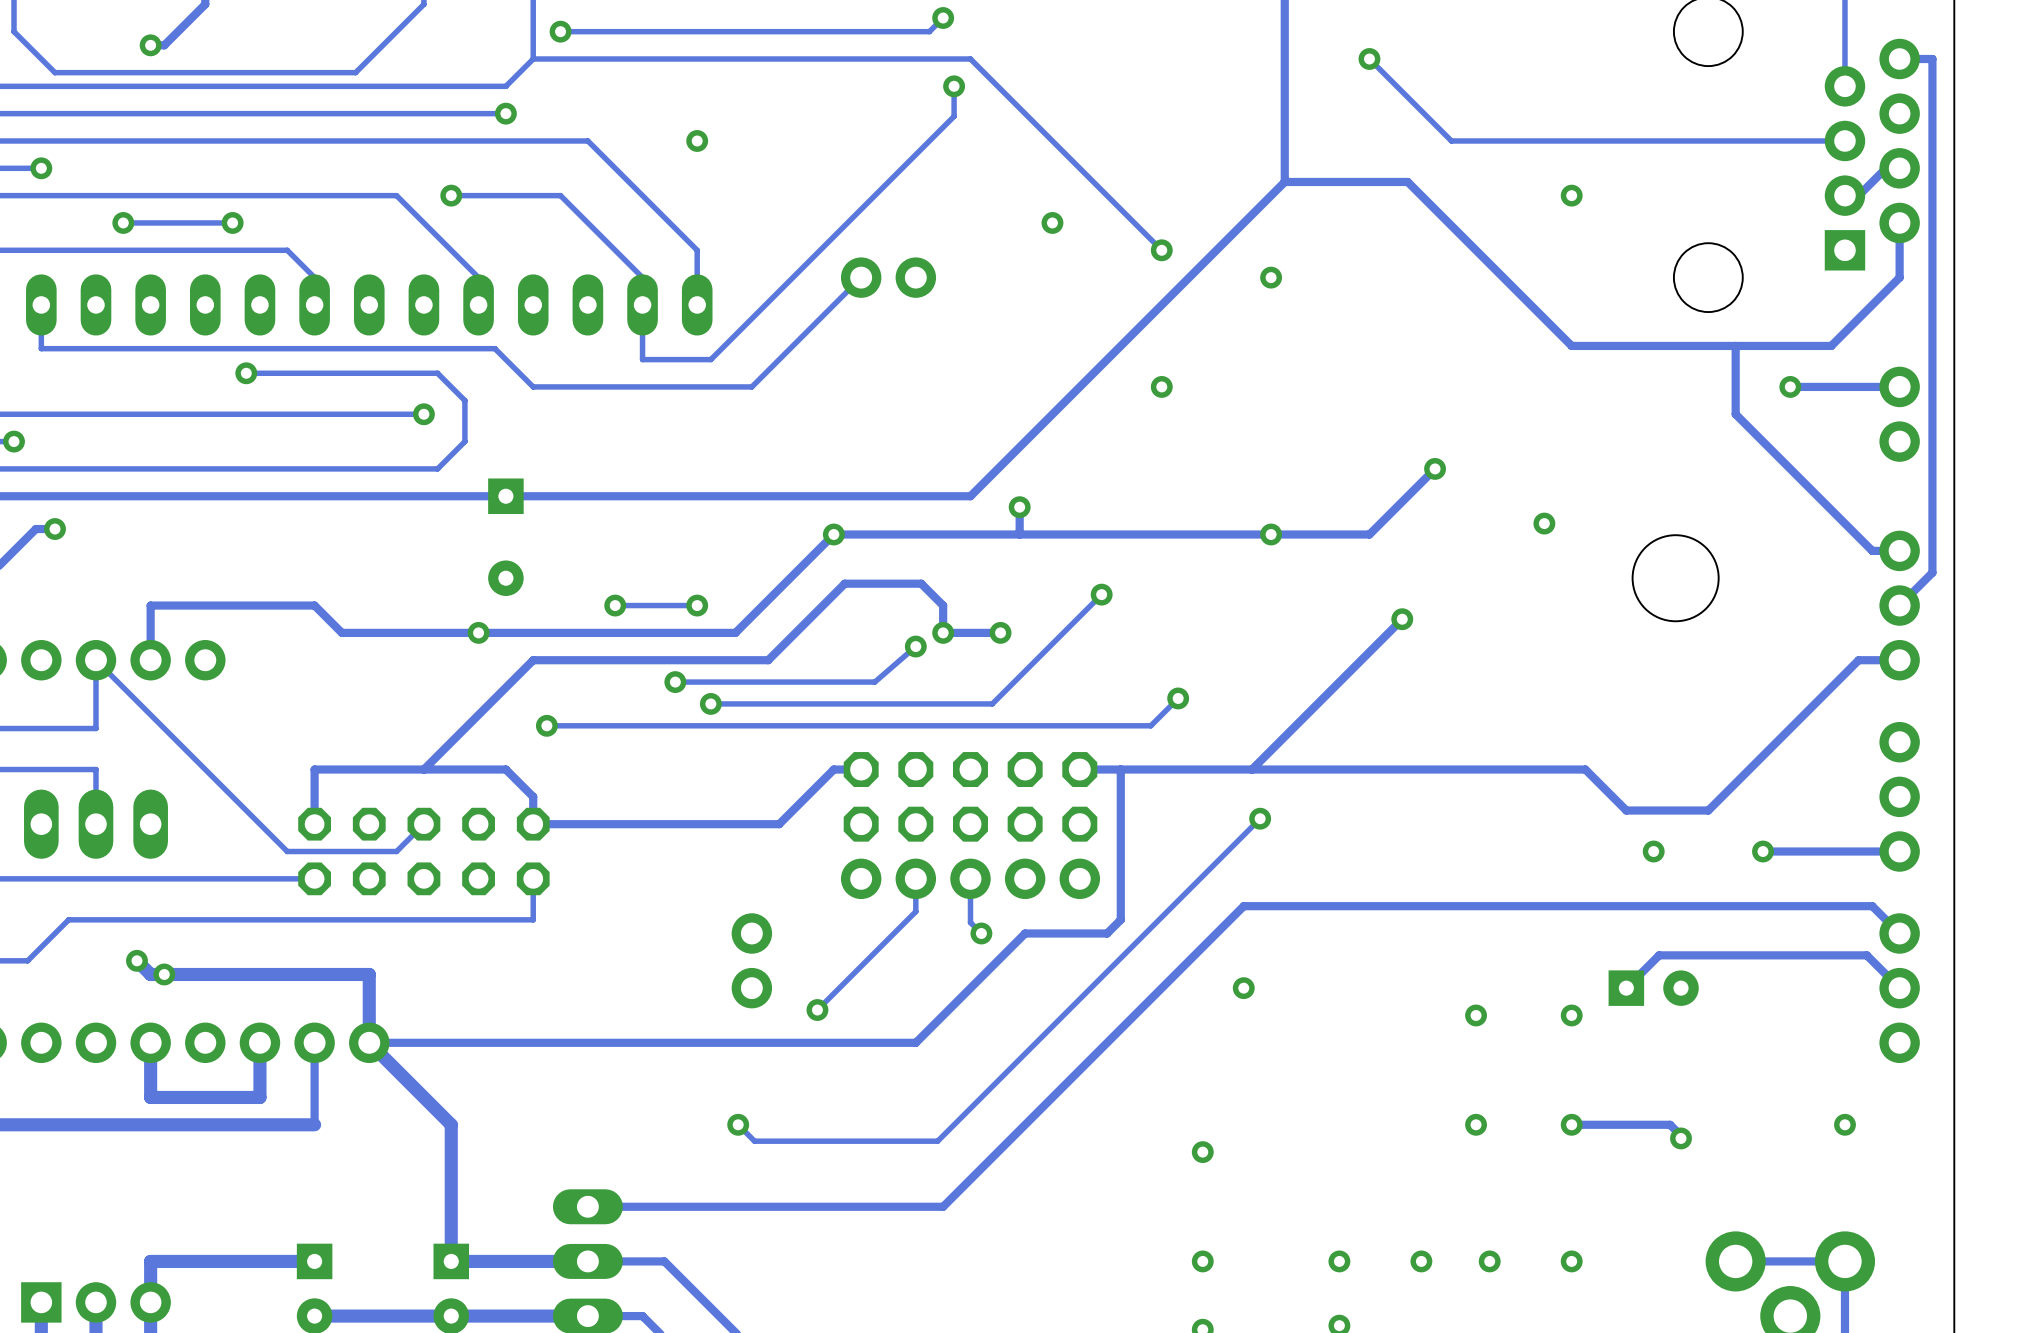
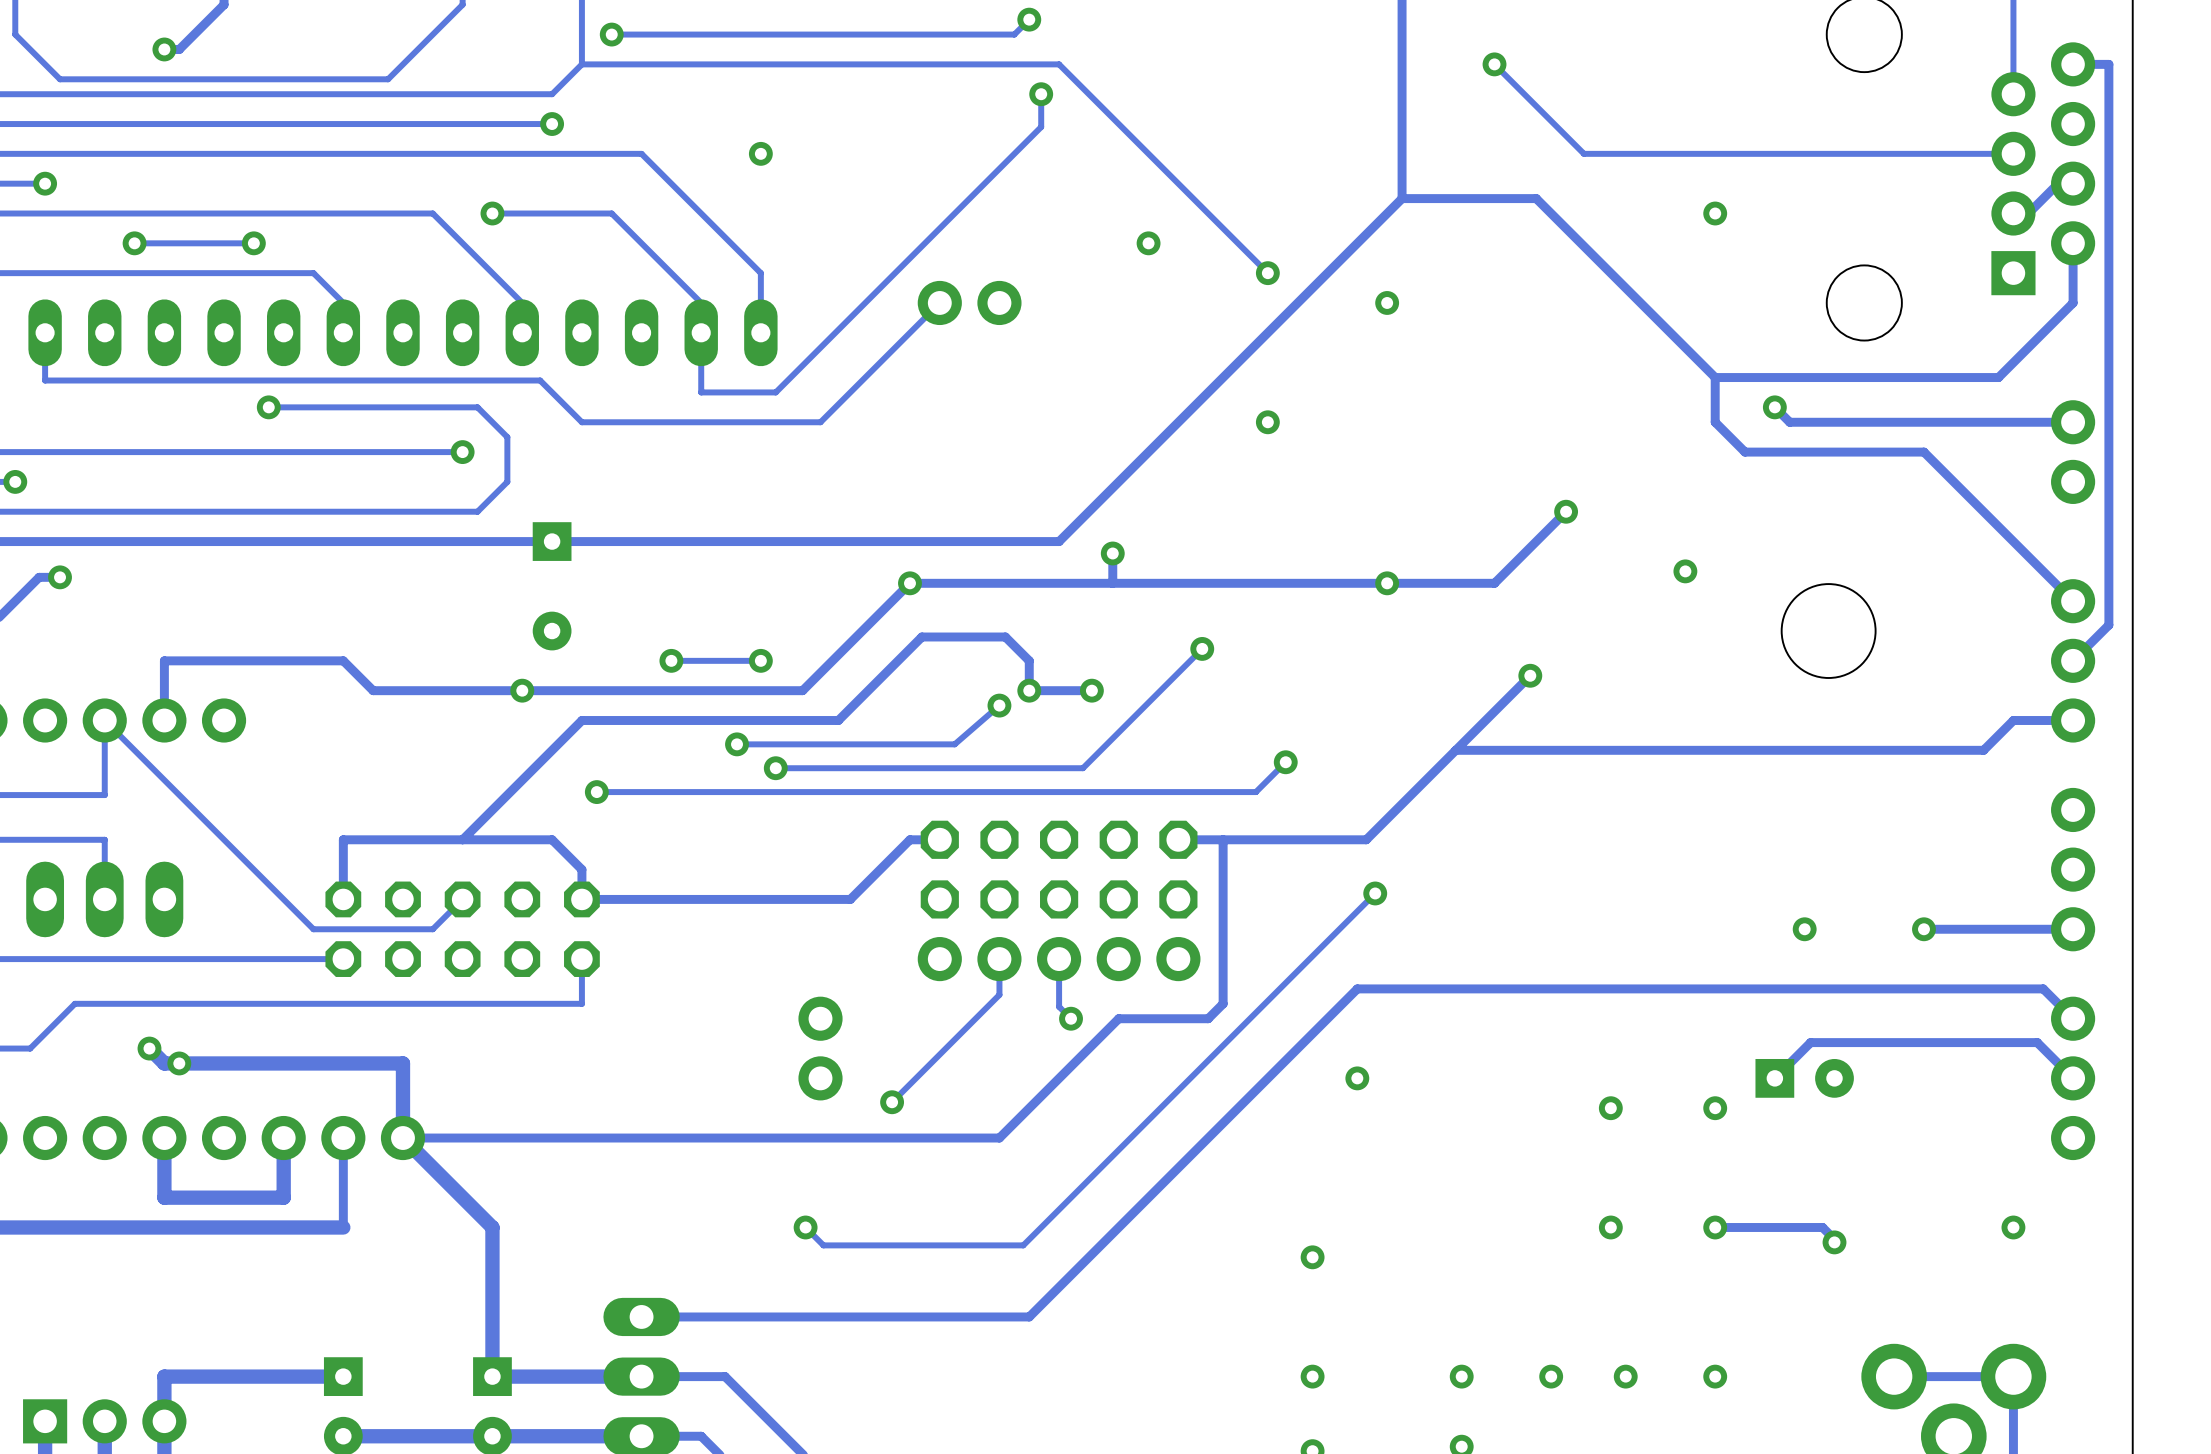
track: (1735, 345) (1735, 414) (1872, 550) (1899, 550) -> (1715, 377) (1715, 422) (1745, 452) (1923, 452) (2073, 601)
track: none -> (1774, 407) (1789, 422) (1953, 422)
via: none -> (1774, 407)
via: (1790, 386) -> none
track: (1858, 660) (1708, 810) (1626, 810) (1585, 769) (1251, 769) -> (2028, 720) (2013, 720) (1983, 750) (1455, 750)

